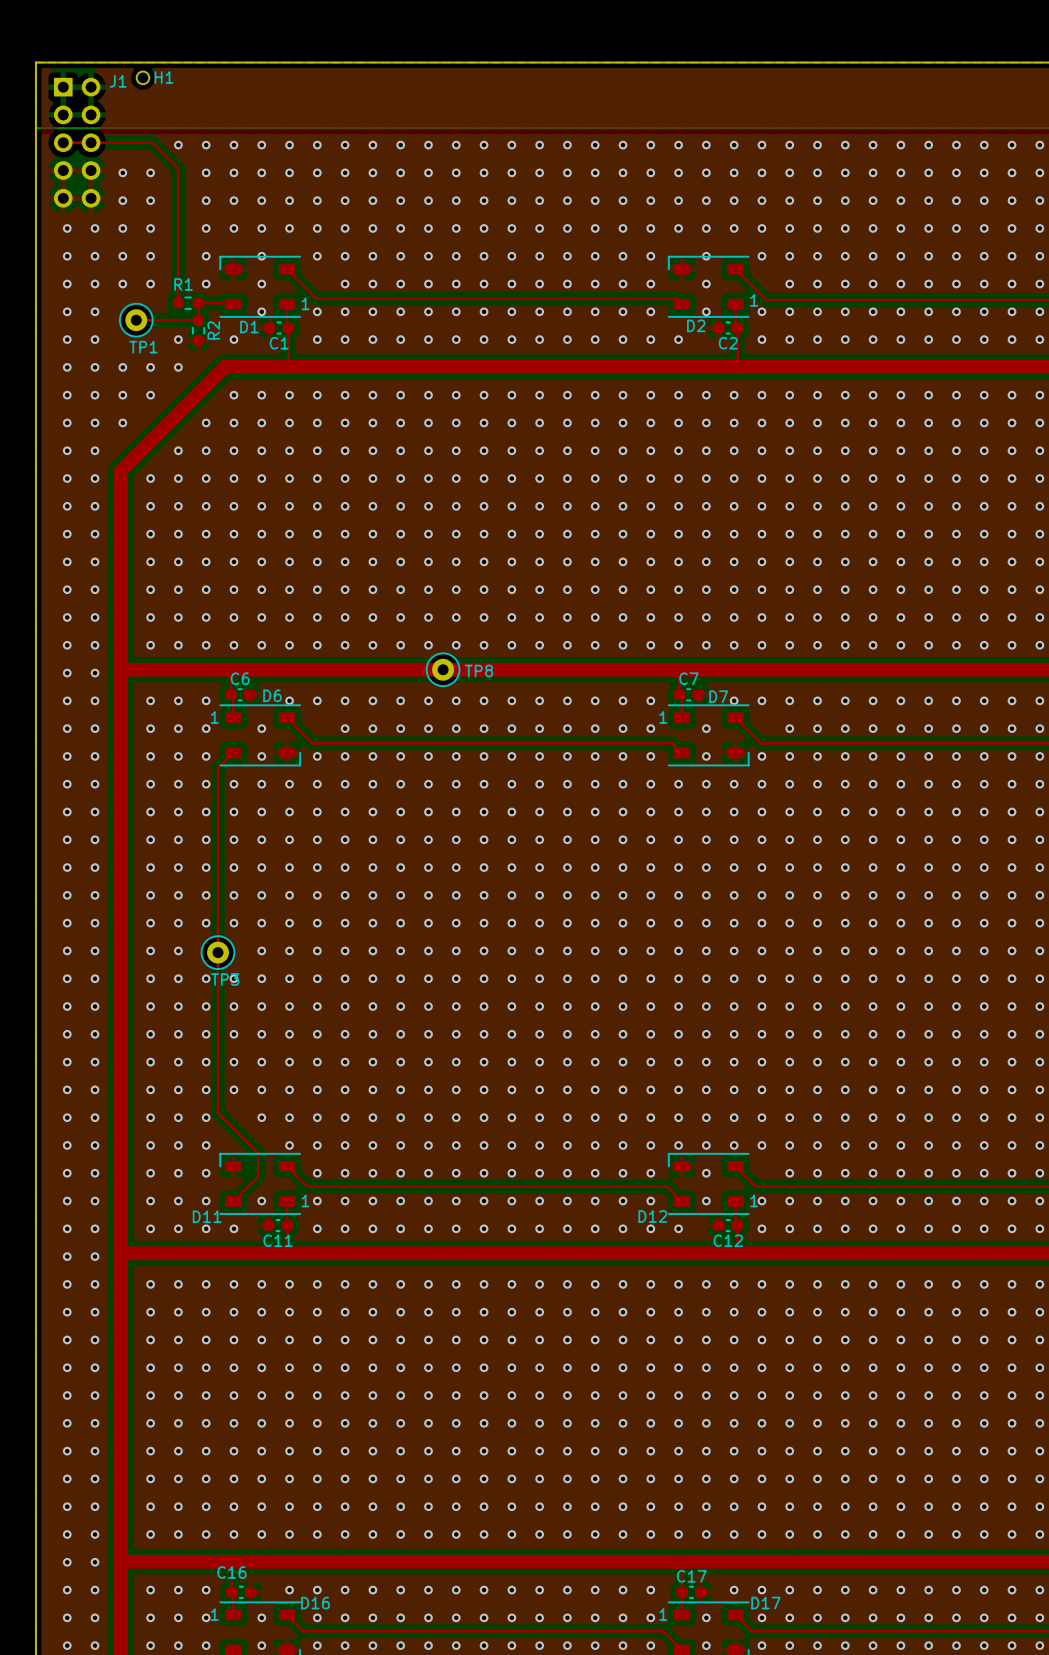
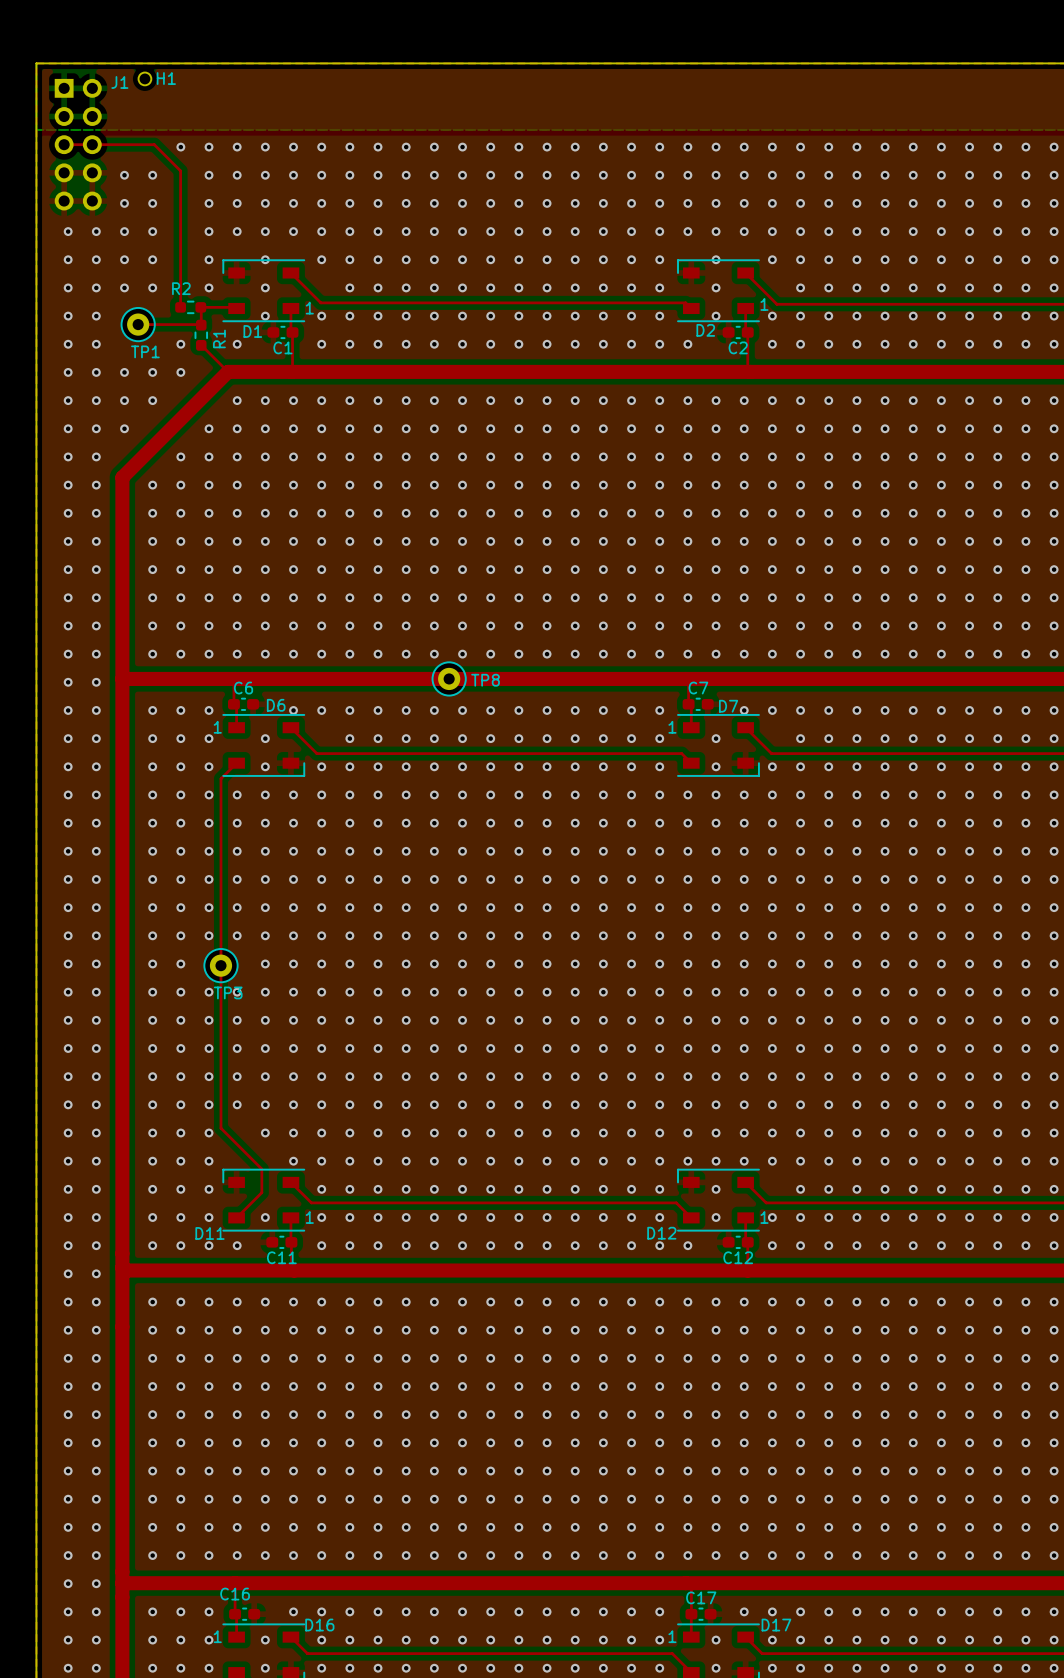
R1 name: R1 (183, 284) -> R2 (181, 288)
R2 name: R2 (213, 330) -> R1 (219, 338)
top track: none -> (201, 344) (228, 371)

